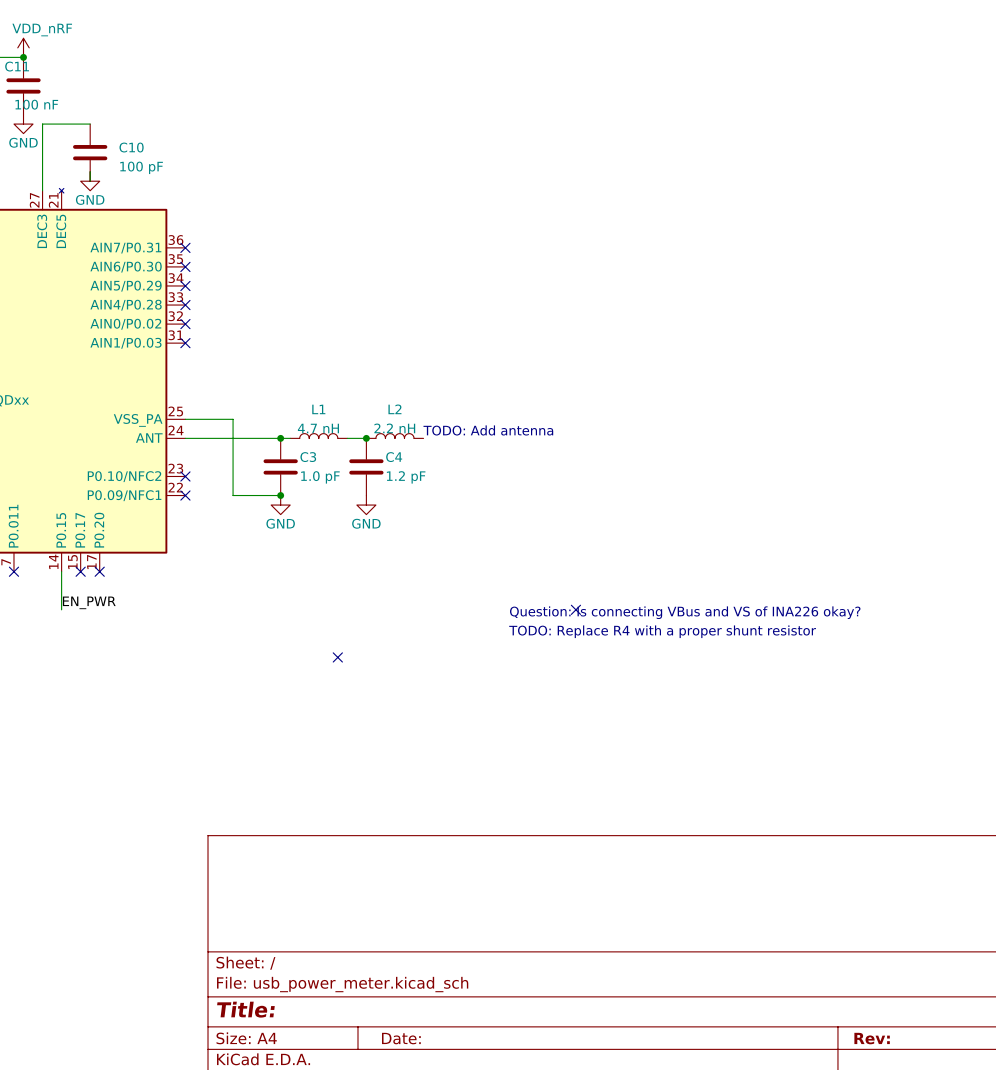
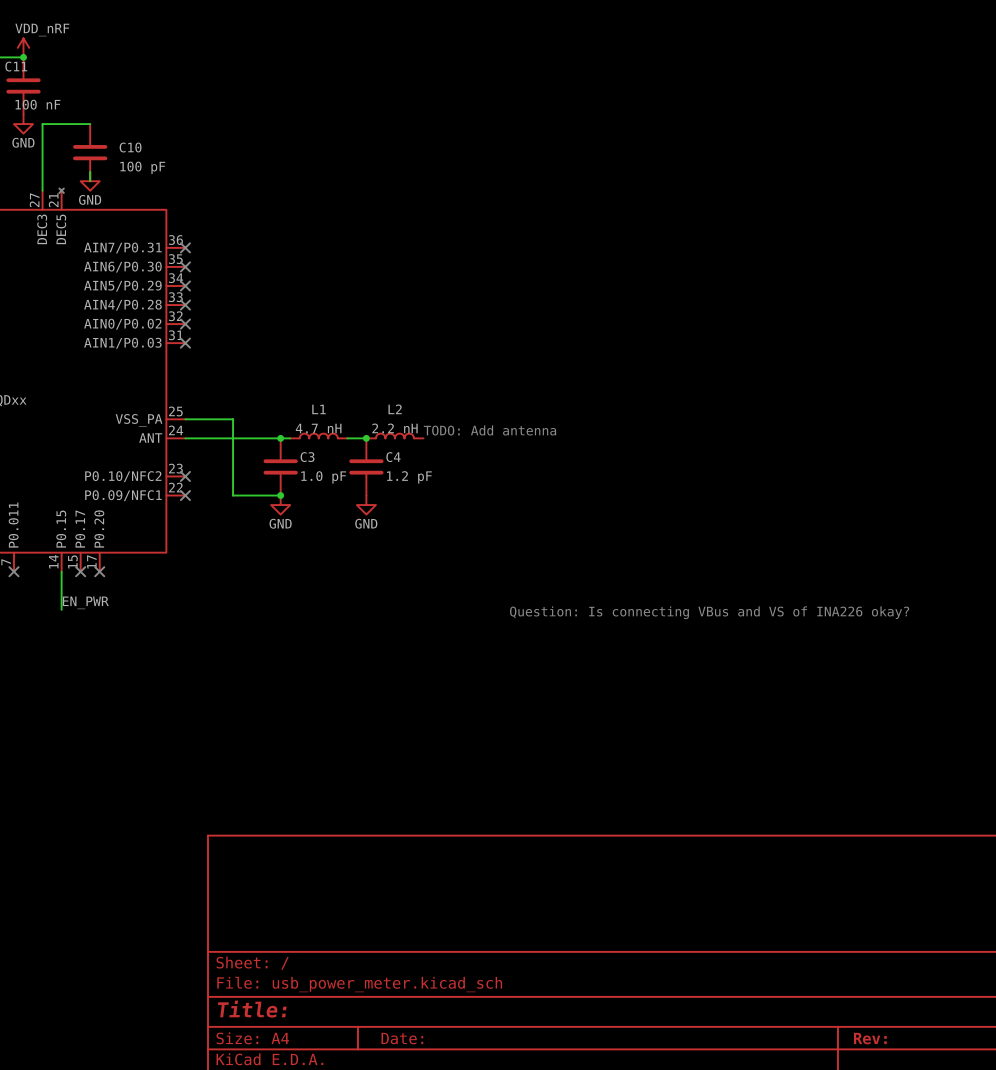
no-connect mark: (575, 609) -> none
text: TODO: Replace R4 with a proper shunt resistor (662, 631) -> none
no-connect mark: (337, 657) -> none

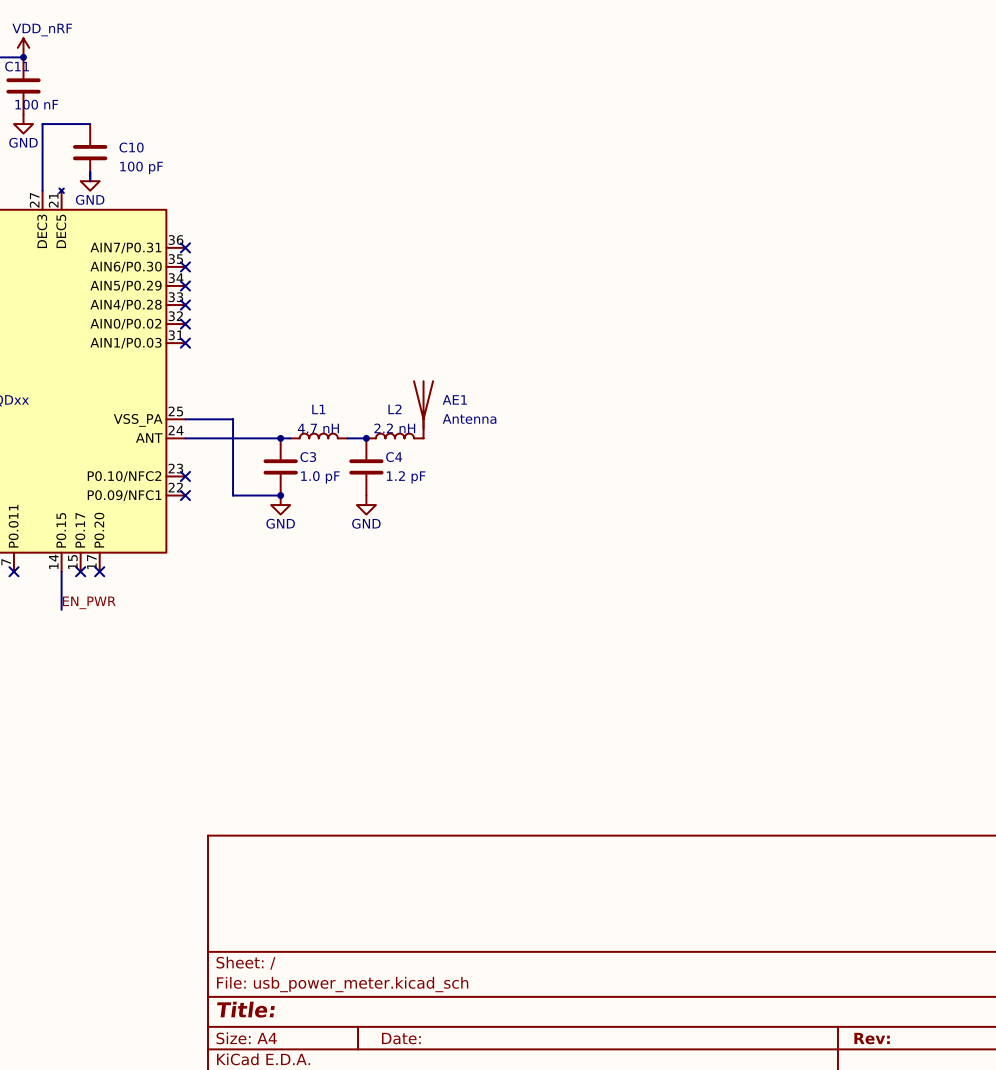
AE1: none -> Antenna (423, 409)
text: TODO: Add antenna (489, 430) -> none
text: Question: Is connecting VBus and VS of INA226 okay? (709, 612) -> none

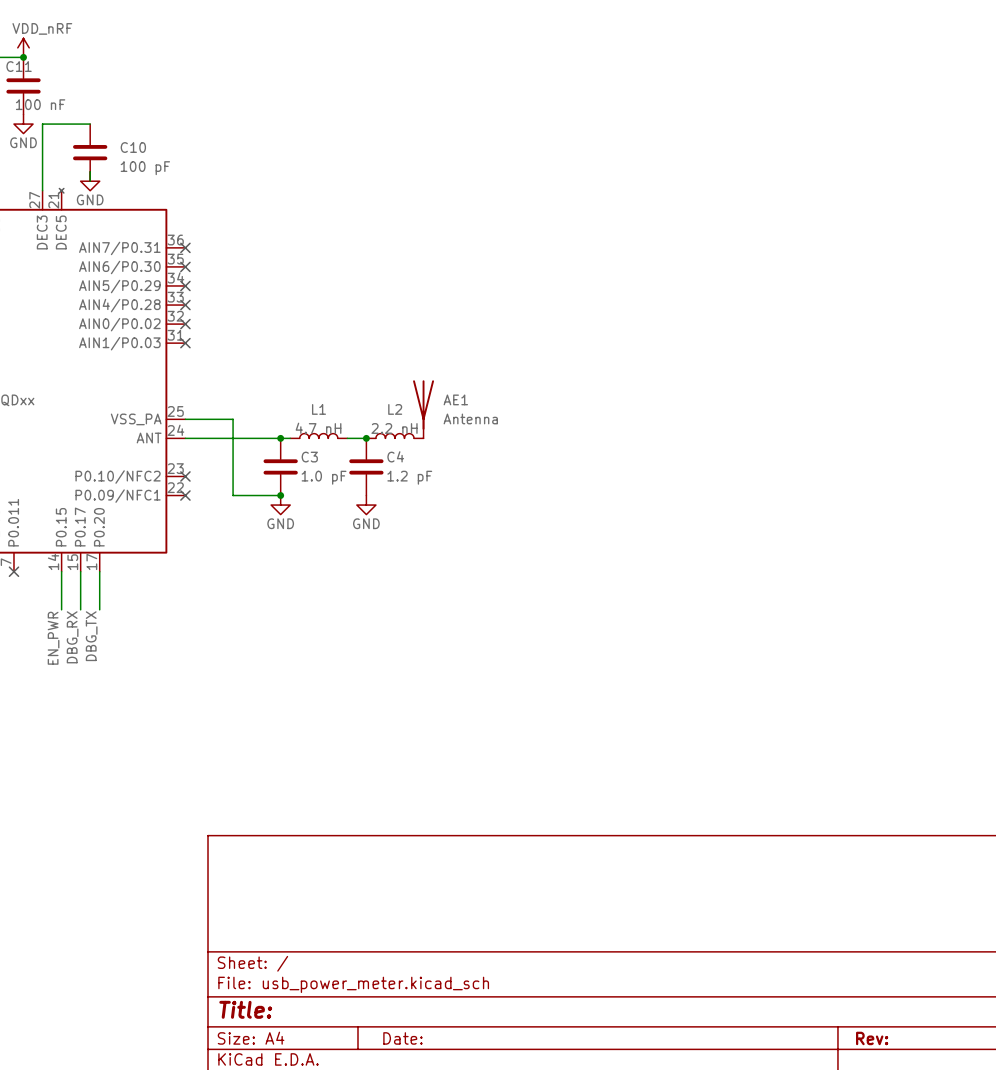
wire: none -> (80, 571) (80, 609)
no-connect mark: (80, 571) -> none
wire: none -> (99, 571) (99, 609)
no-connect mark: (99, 571) -> none
label rotation: 0° (89, 602) -> 90° counterclockwise (53, 638)
label: none -> DBG_TX (91, 636)
label: none -> DBG_RX (72, 637)

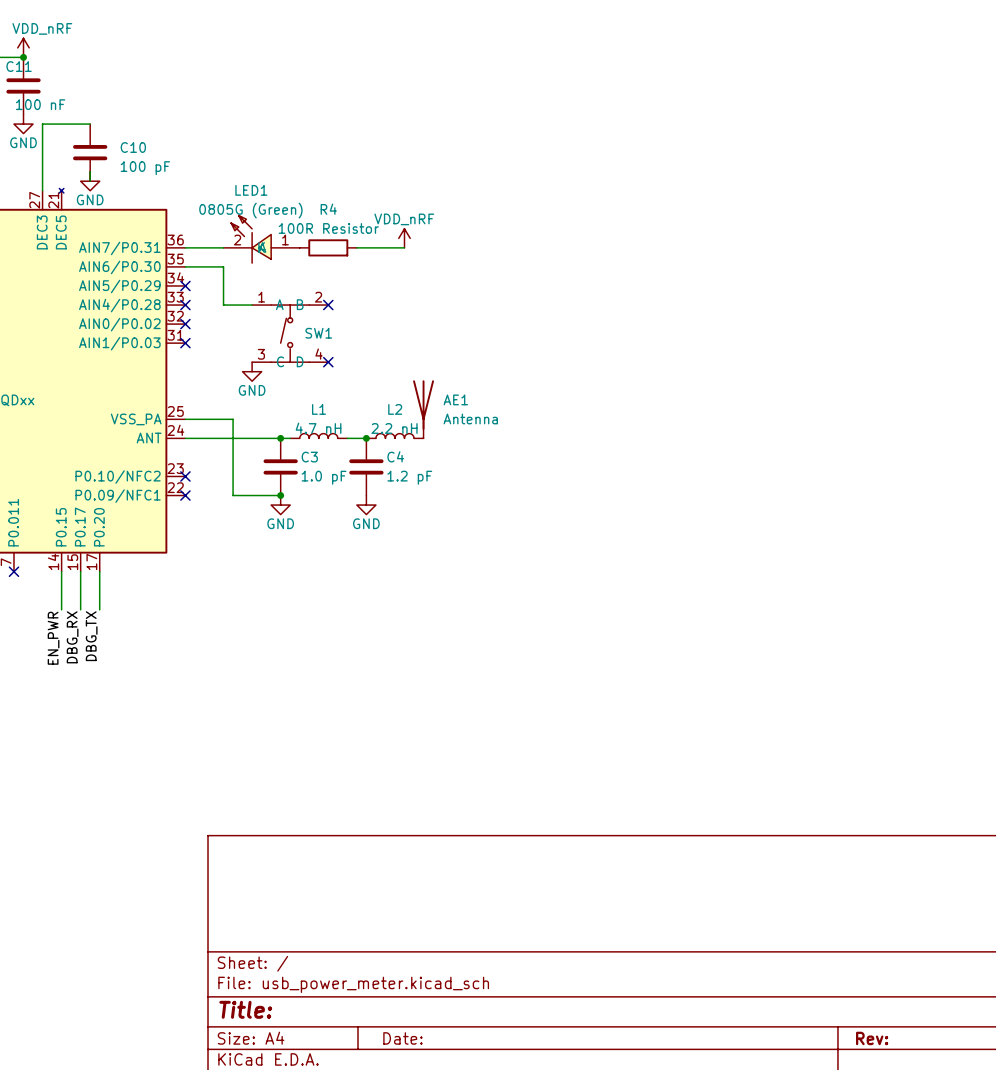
power symbol: none -> VDD_nRF (404, 238)
LED1: none -> 0805G (Green) (261, 239)
wire: none -> (185, 247) (223, 247)
no-connect mark: (185, 247) -> none
R4: none -> 100R Resistor (328, 247)
wire: none -> (356, 247) (404, 247)
wire: none -> (185, 266) (223, 266) (223, 305) (252, 305)
no-connect mark: (185, 266) -> none
no-connect mark: none -> (328, 305)
SW1: none -> (290, 333)
no-connect mark: none -> (328, 362)
power symbol: none -> GND (252, 371)

